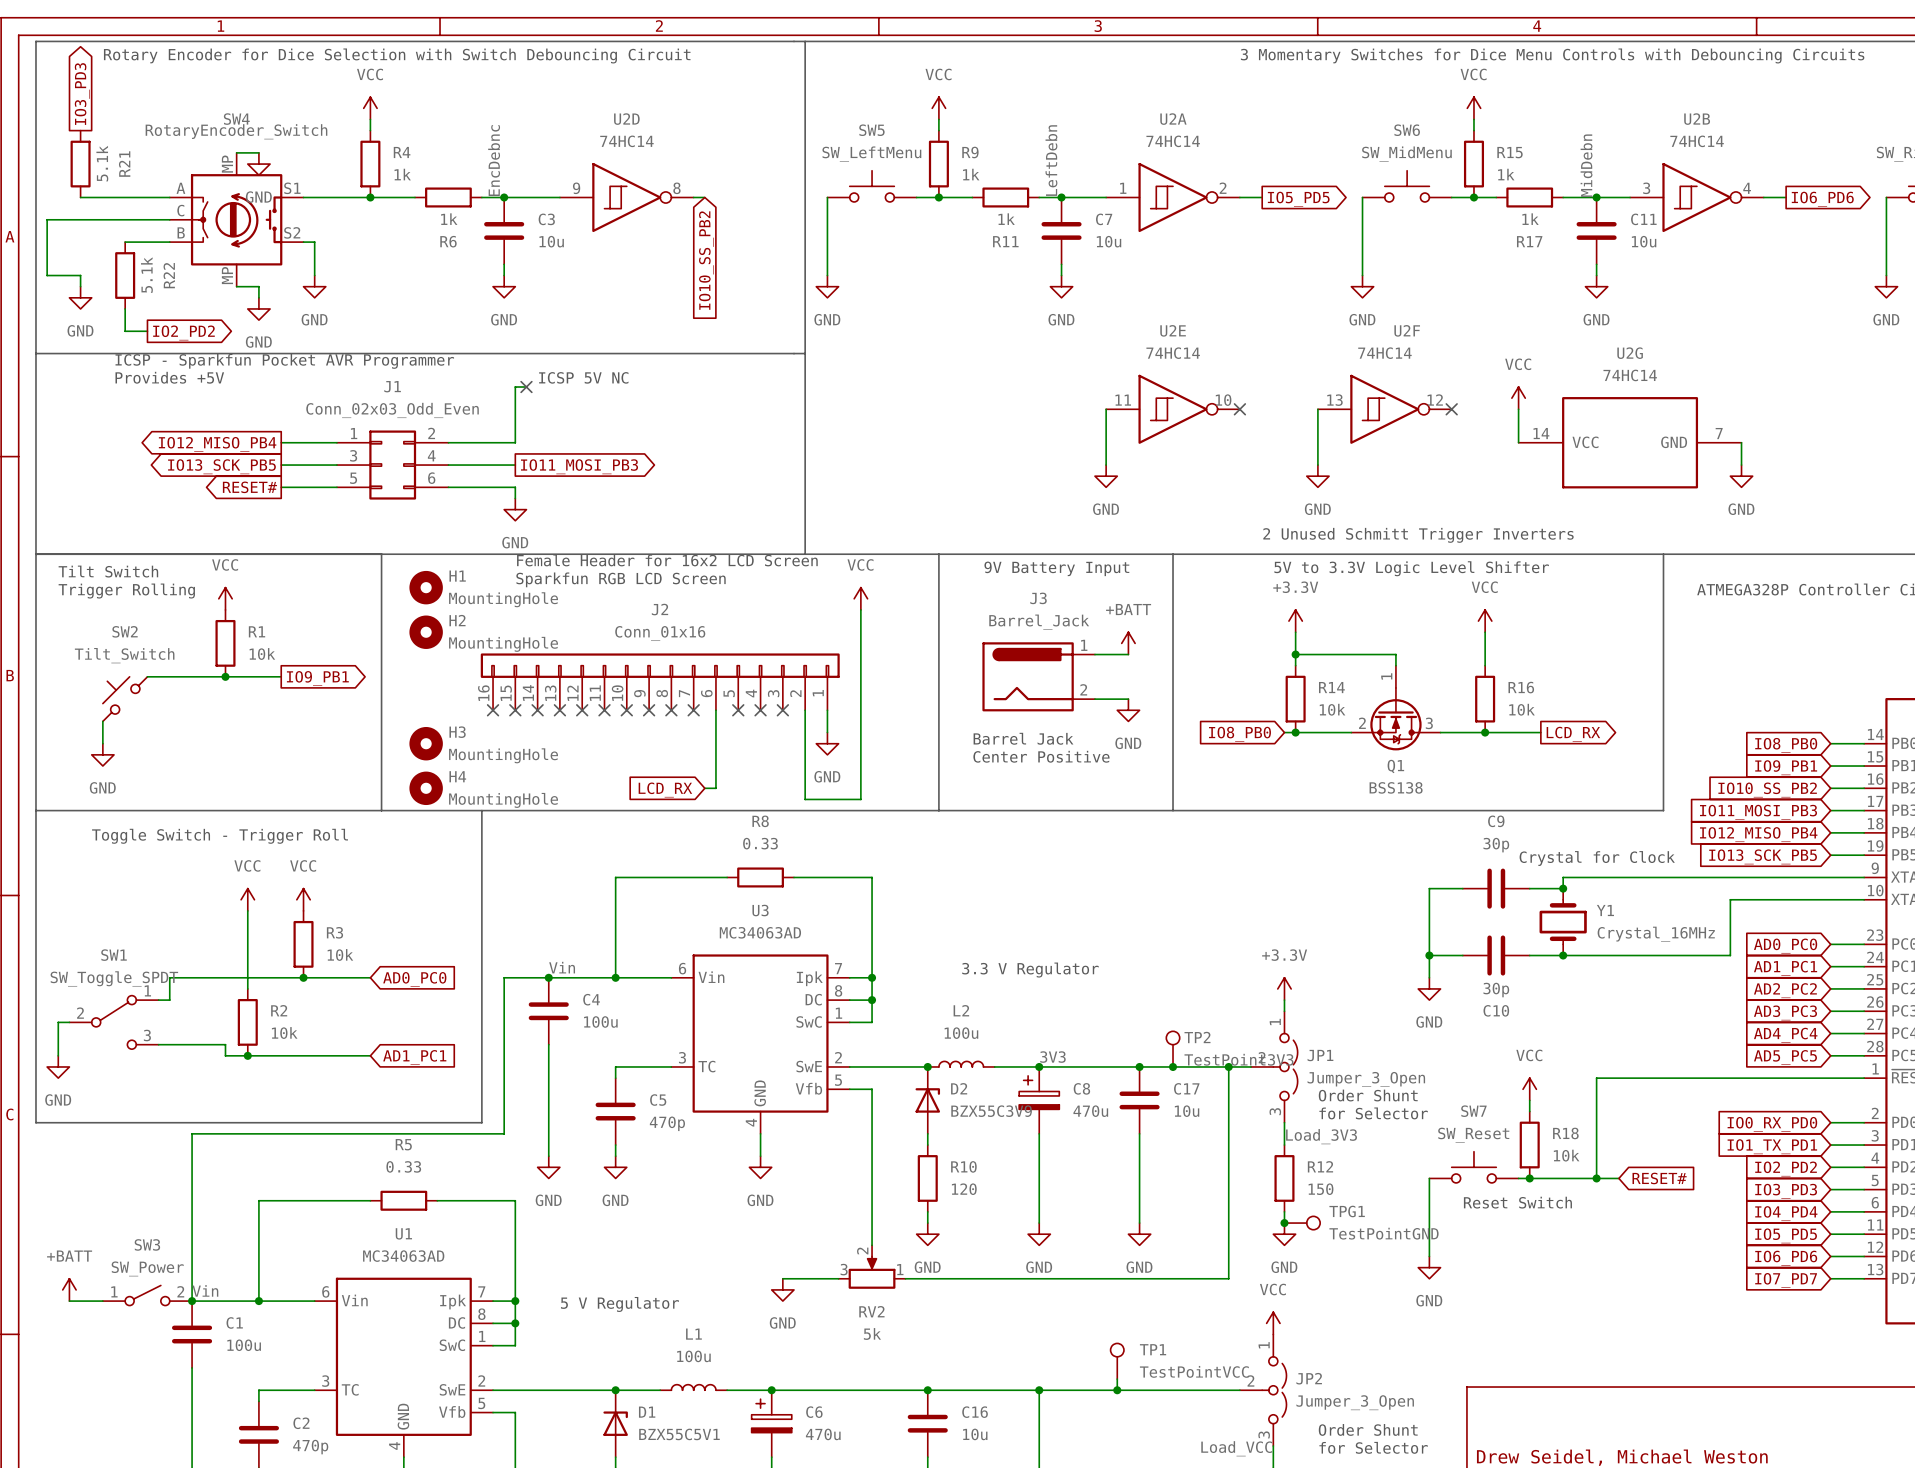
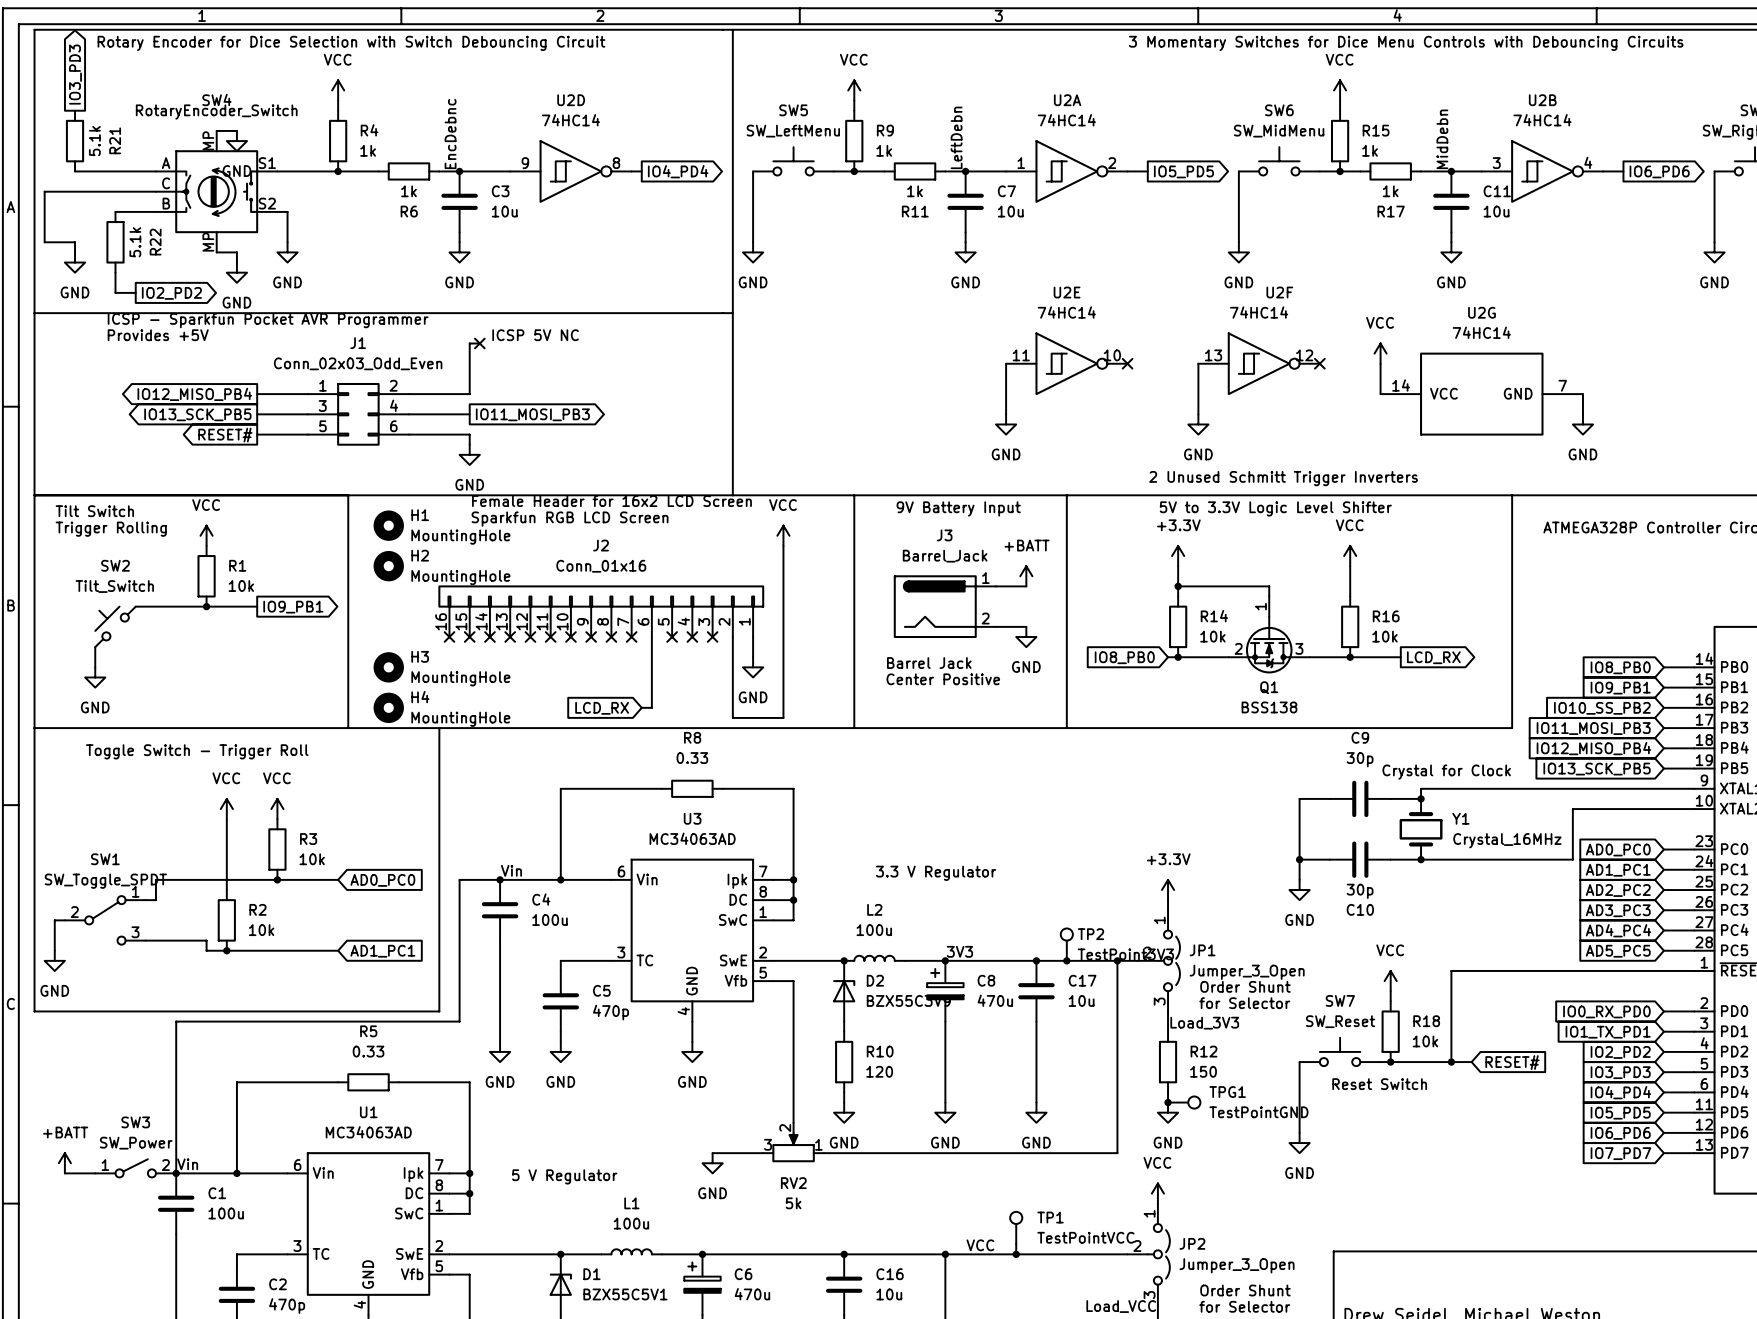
global label shape: input (706, 260) -> output (678, 171)
global label: IO10_SS_PB2 (706, 260) -> IO4_PD4 (678, 171)
label: none -> VCC (980, 1245)

